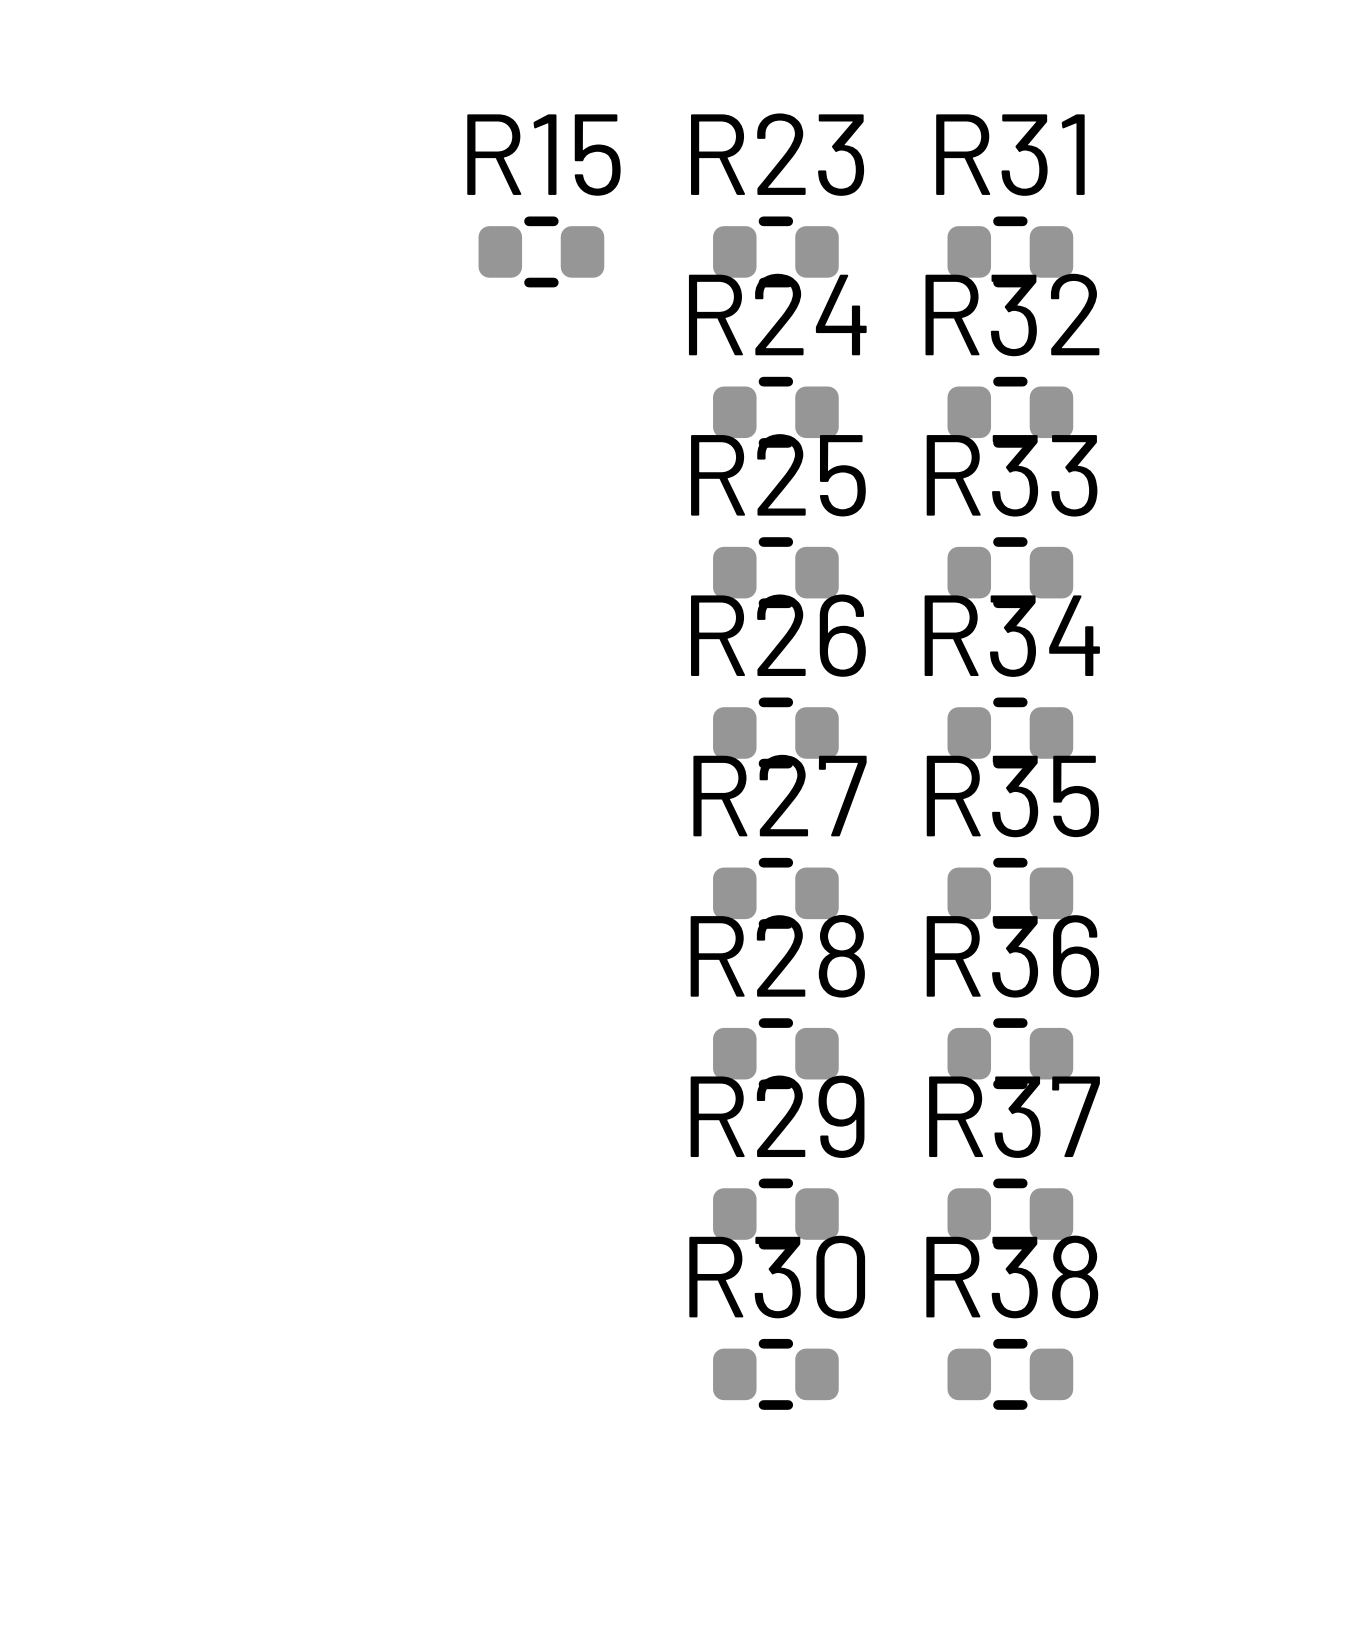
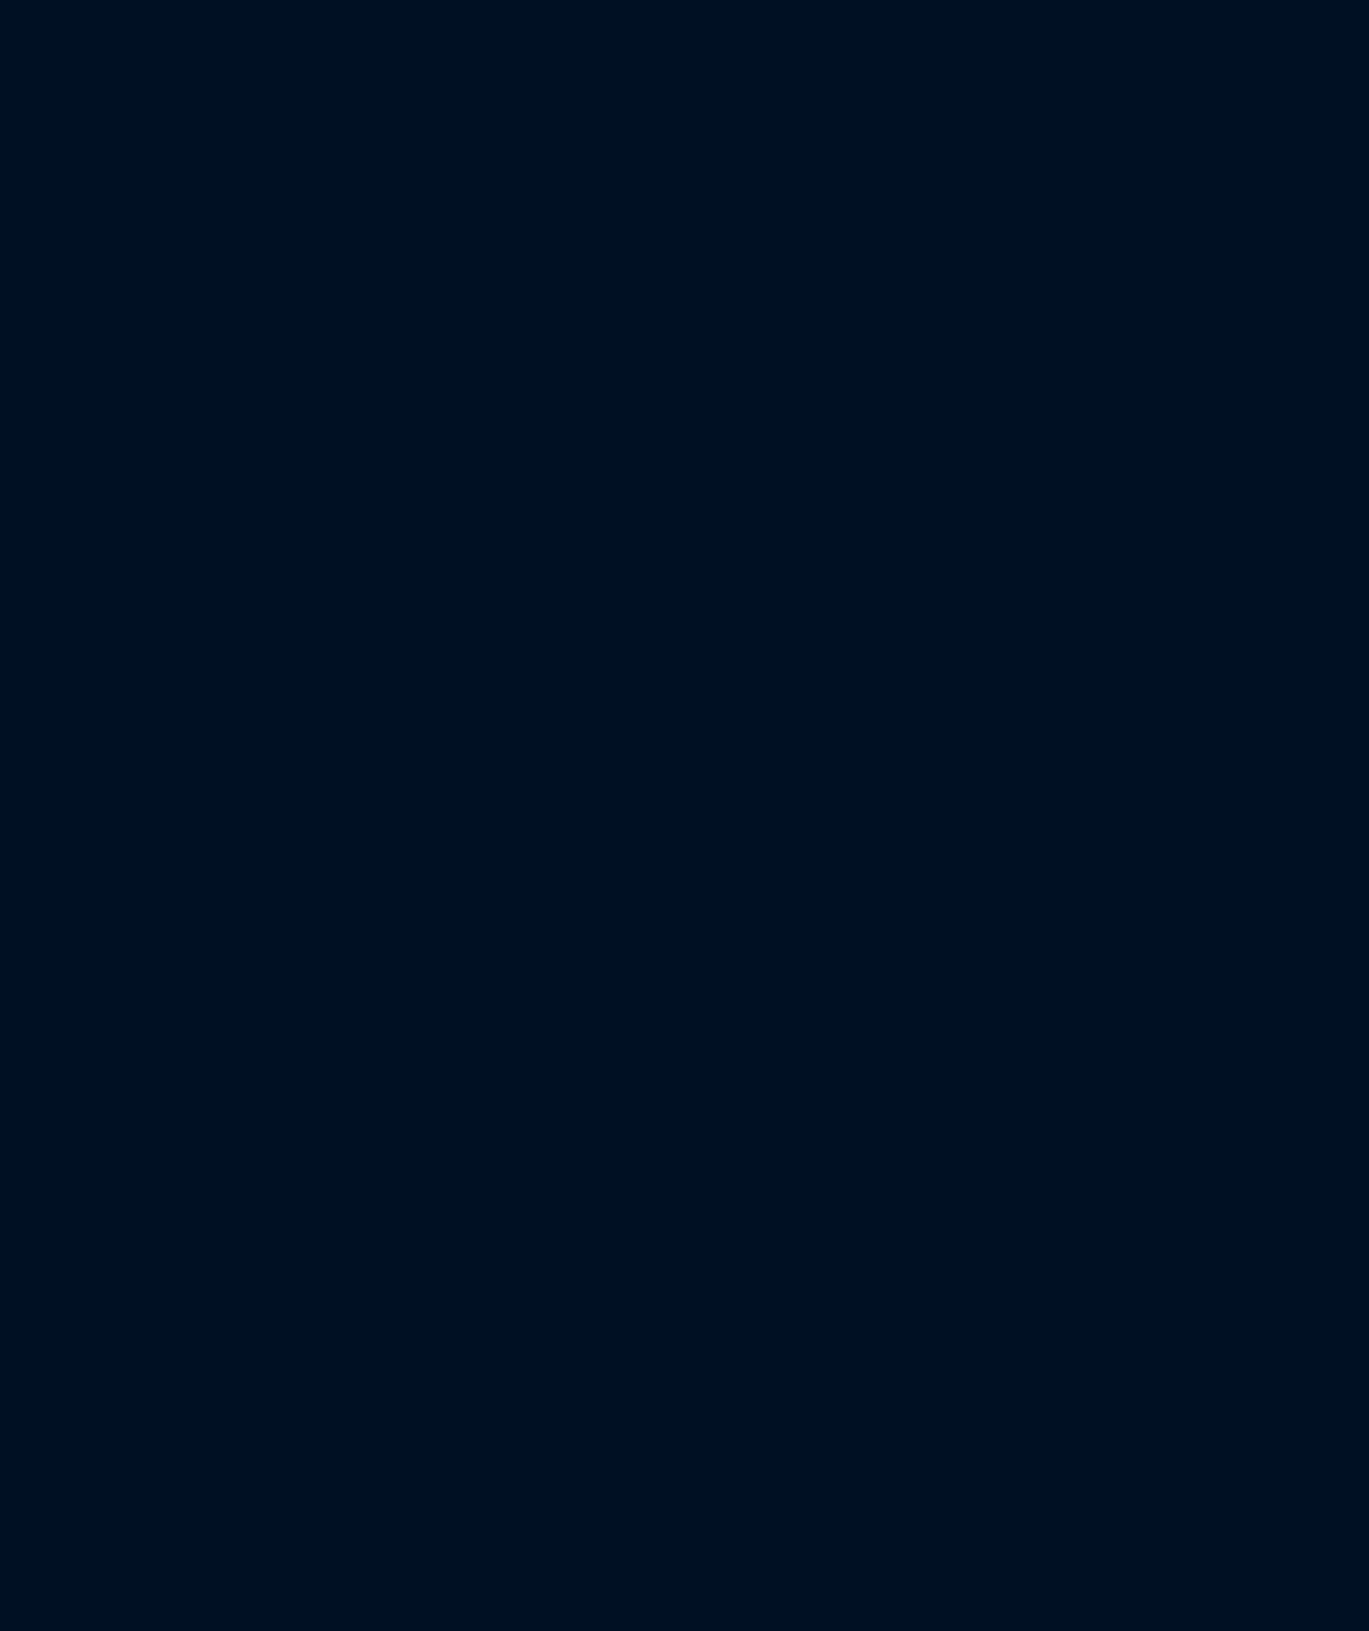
R15: (541, 251) -> none
R23: (775, 251) -> none
R31: (1010, 251) -> none
R24: (775, 412) -> none
R32: (1010, 412) -> none
R25: (775, 572) -> none
R33: (1010, 572) -> none
R26: (775, 732) -> none
R34: (1010, 732) -> none
R27: (775, 893) -> none
R35: (1010, 893) -> none
R28: (775, 1053) -> none
R36: (1010, 1053) -> none
R29: (775, 1214) -> none
R37: (1010, 1214) -> none
R30: (775, 1374) -> none
R38: (1010, 1374) -> none

